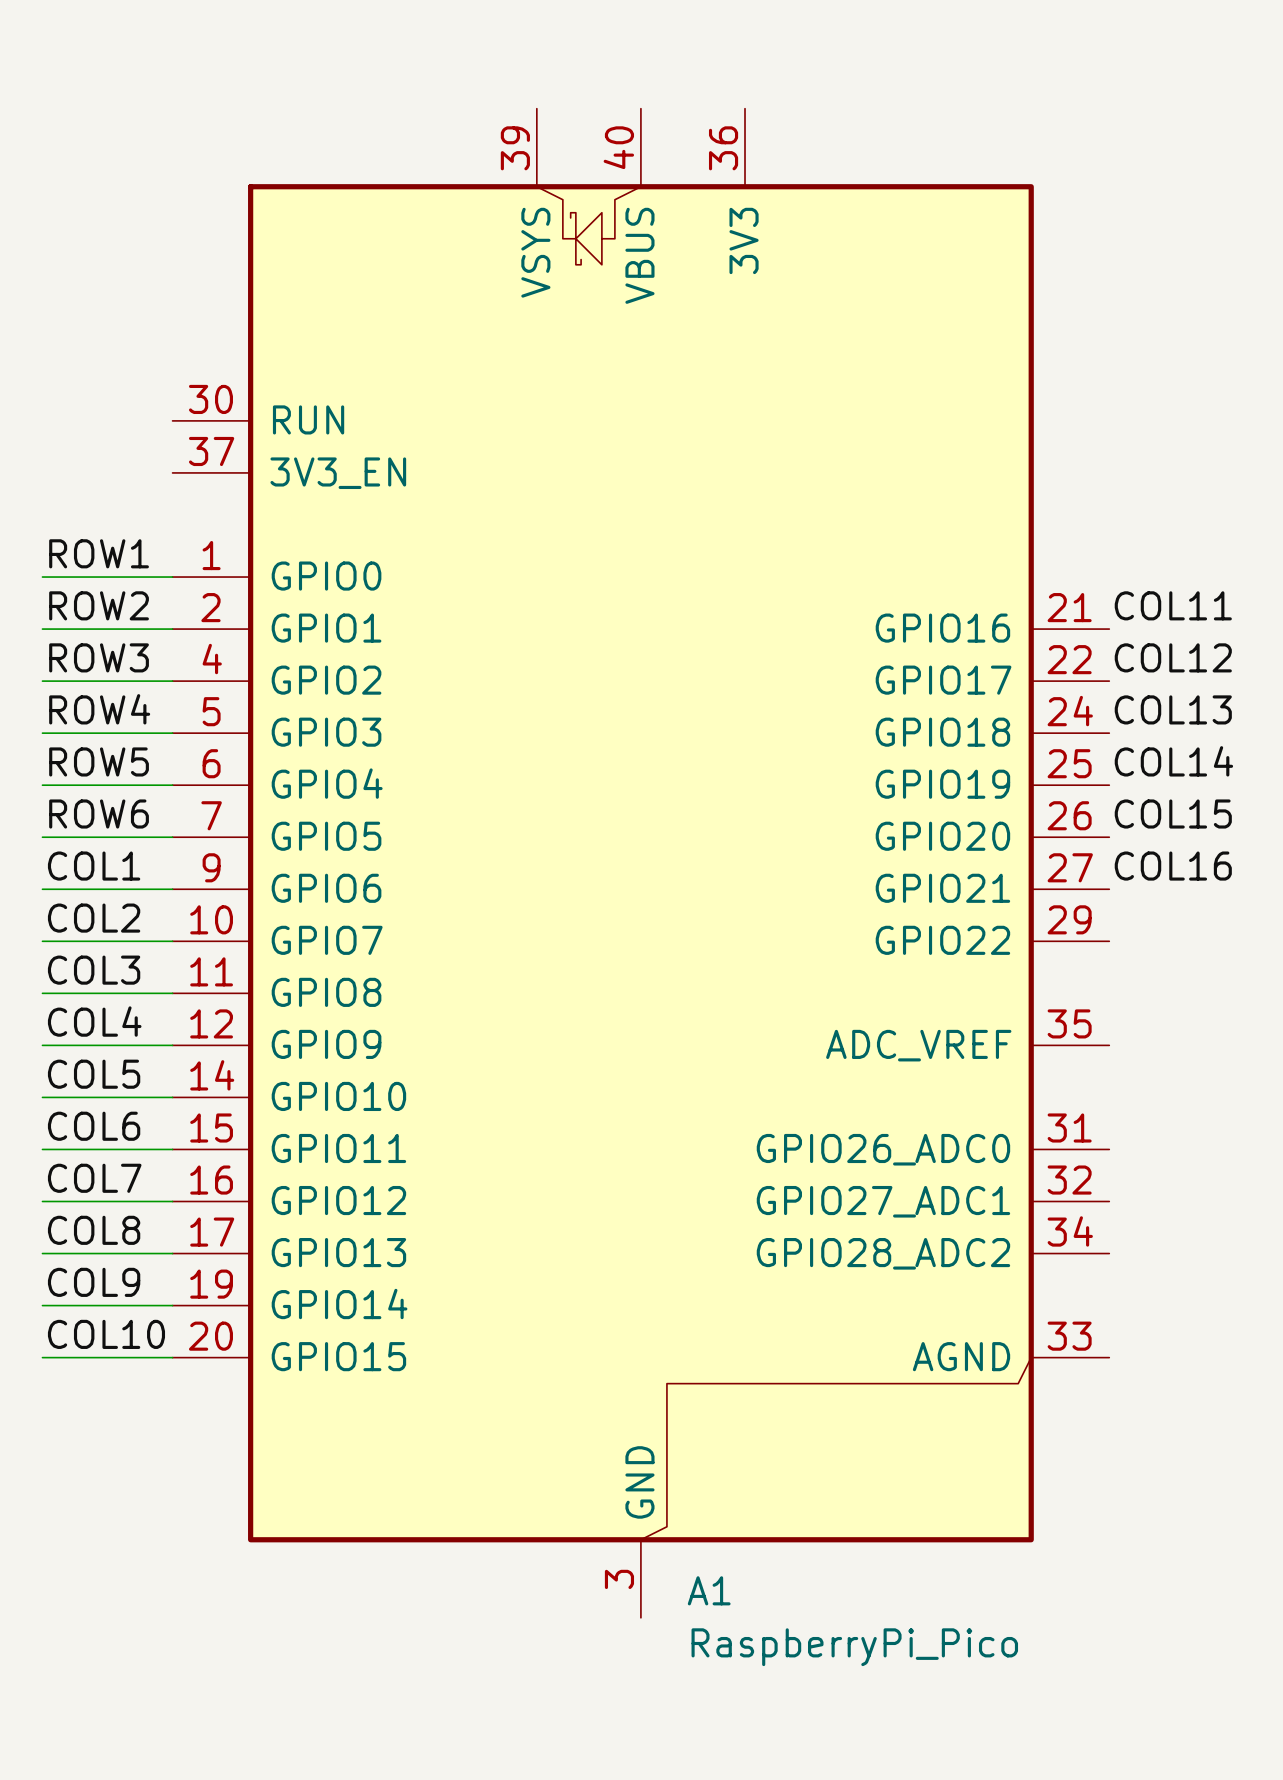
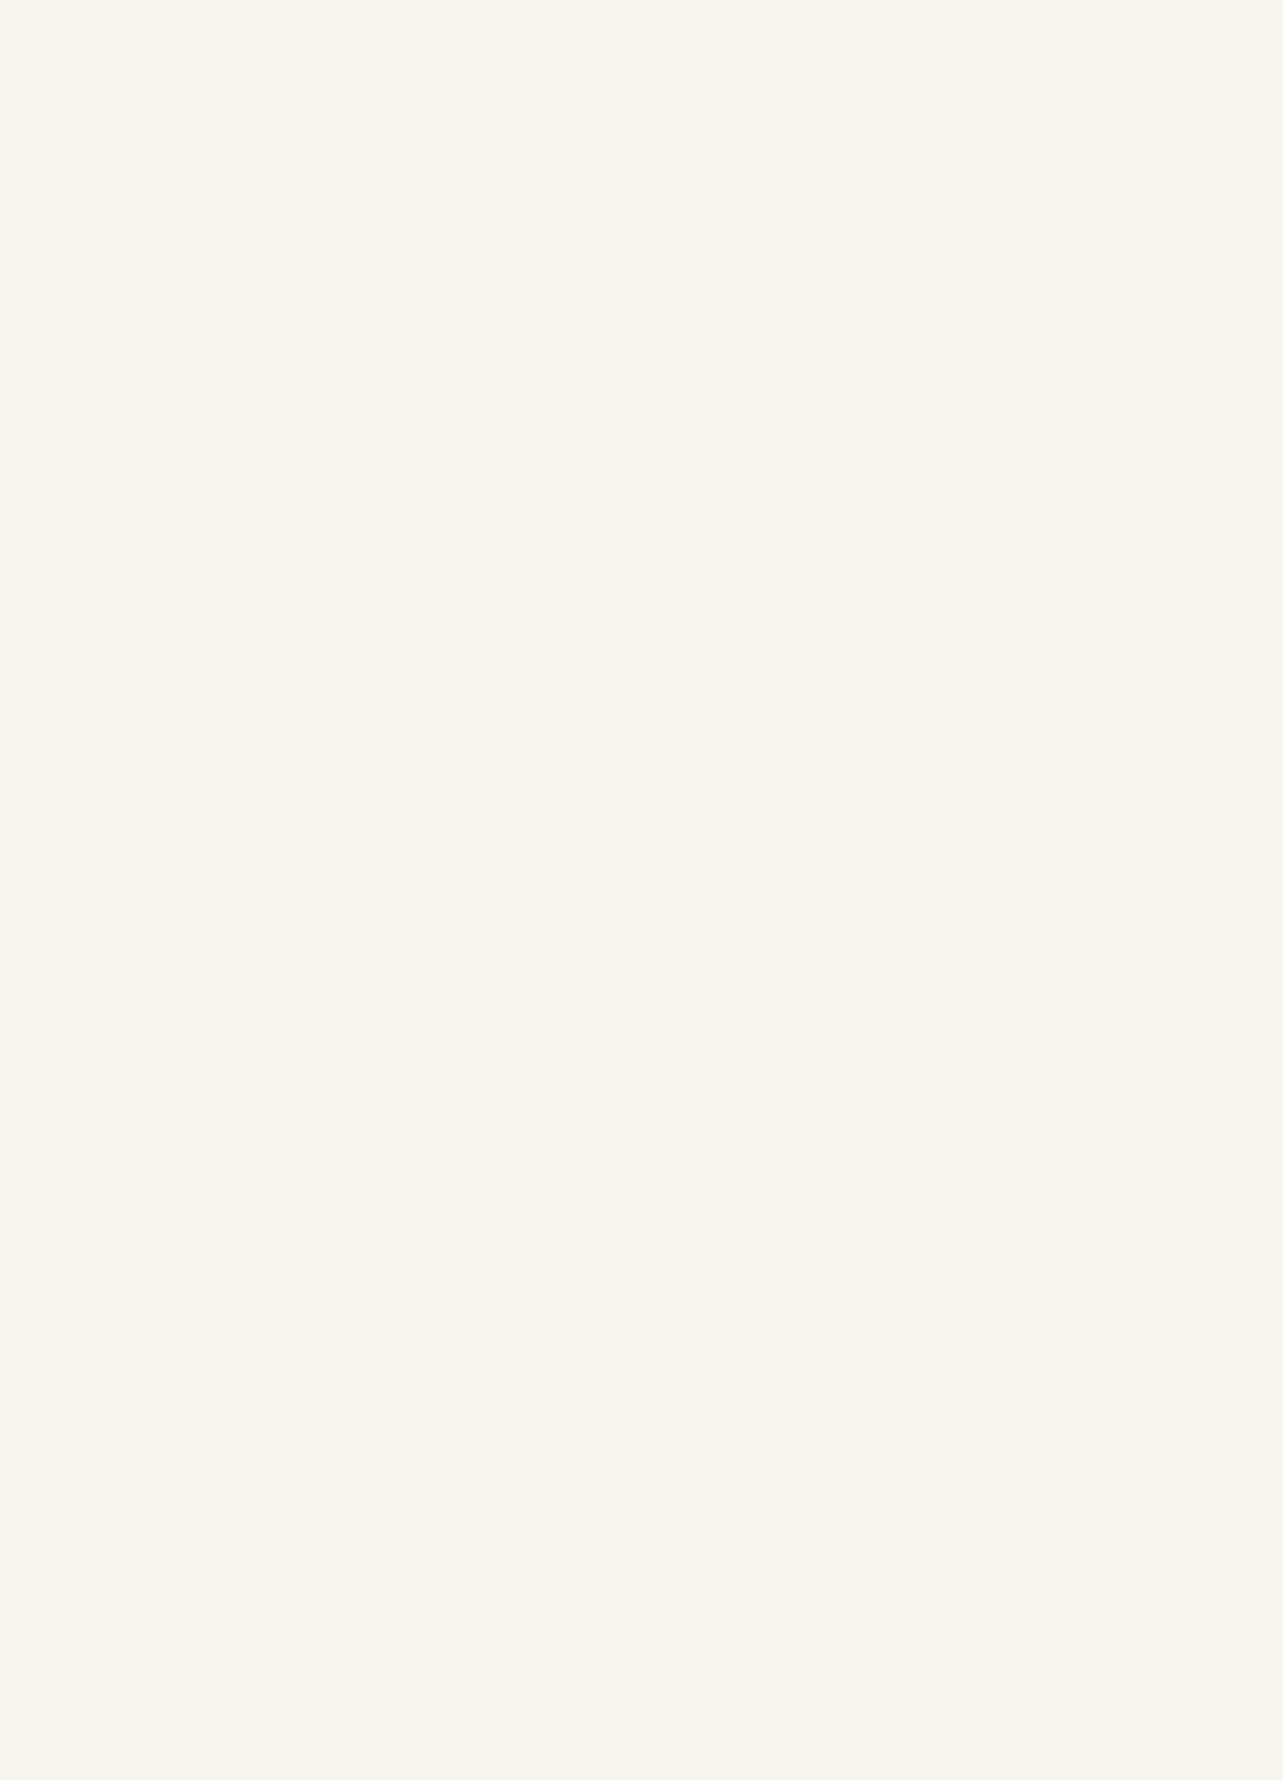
label: ROW1 (99, 553) -> none
wire: (42, 577) (172, 577) -> none
label: ROW2 (99, 605) -> none
label: COL11 (1173, 605) -> none
wire: (42, 629) (172, 629) -> none
label: ROW3 (99, 657) -> none
label: COL12 (1173, 657) -> none
wire: (42, 681) (172, 681) -> none
label: ROW4 (99, 709) -> none
label: COL13 (1173, 709) -> none
wire: (42, 733) (172, 733) -> none
label: ROW5 (99, 761) -> none
label: COL14 (1173, 761) -> none
wire: (42, 785) (172, 785) -> none
label: ROW6 (99, 814) -> none
label: COL15 (1173, 814) -> none
wire: (42, 837) (172, 837) -> none
A1: RaspberryPi_Pico (640, 863) -> none
label: COL1 (94, 866) -> none
label: COL16 (1173, 866) -> none
wire: (42, 889) (172, 889) -> none
label: COL2 (94, 918) -> none
wire: (42, 941) (172, 941) -> none
label: COL3 (94, 970) -> none
wire: (42, 993) (172, 993) -> none
label: COL4 (94, 1021) -> none
wire: (42, 1045) (172, 1045) -> none
label: COL5 (94, 1074) -> none
wire: (42, 1097) (172, 1097) -> none
label: COL6 (94, 1126) -> none
wire: (42, 1149) (172, 1149) -> none
label: COL7 (94, 1178) -> none
wire: (42, 1201) (172, 1201) -> none
label: COL8 (94, 1230) -> none
wire: (42, 1253) (172, 1253) -> none
label: COL9 (94, 1282) -> none
wire: (42, 1305) (172, 1305) -> none
label: COL10 (106, 1334) -> none
wire: (42, 1357) (172, 1357) -> none

